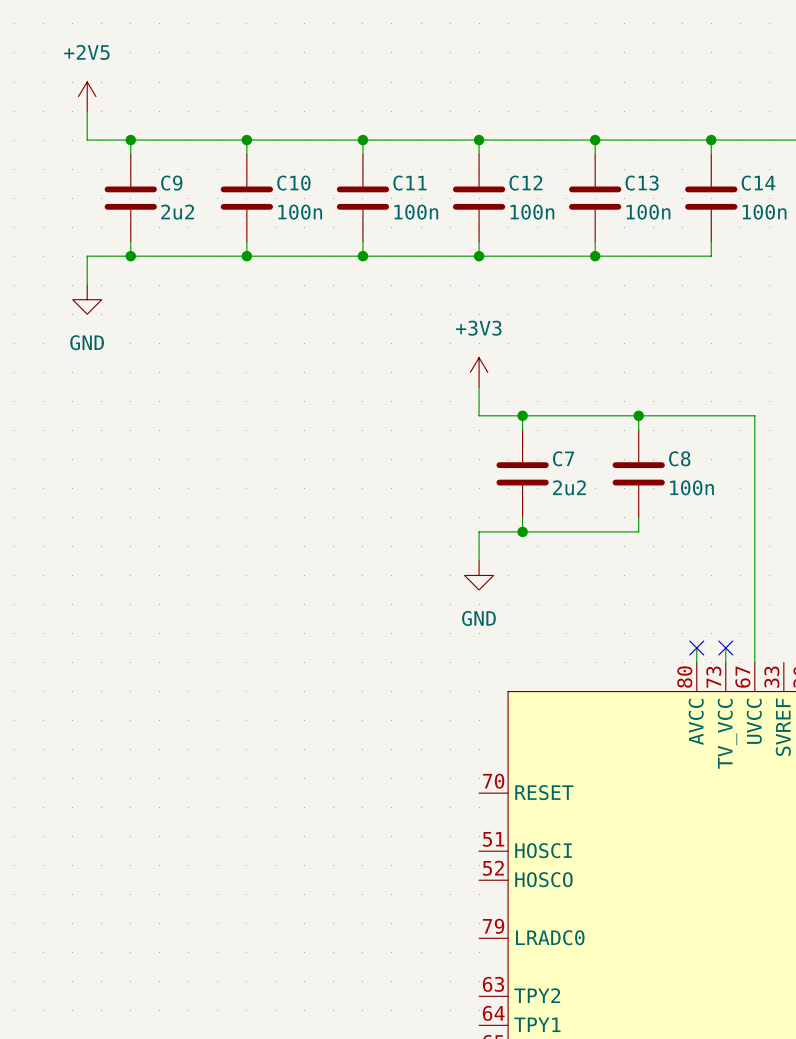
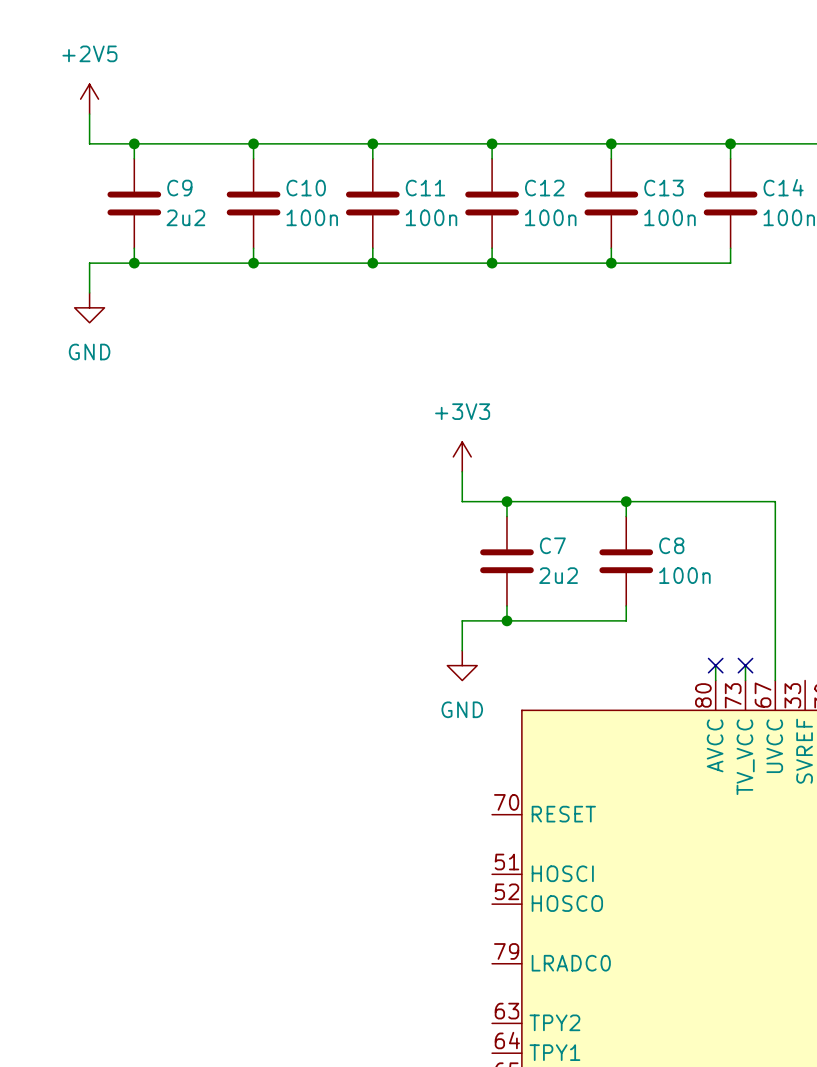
power symbol position: +3V3 (479, 372) -> +3V3 (462, 456)
wire: (479, 386) (479, 415) (754, 415) (754, 488) -> (462, 471) (462, 501) (775, 501)
wire: (522, 415) (522, 430) -> (506, 501) (506, 516)
junction: (522, 415) -> none
wire: (638, 415) (638, 430) -> (626, 501) (626, 516)
junction: (638, 415) -> none
C7 position: (522, 473) -> (506, 561)
C8 position: (638, 473) -> (626, 561)
junction: none -> (506, 501)
junction: none -> (626, 501)
wire: (522, 517) (522, 531) -> (506, 605) (506, 620)
wire: (638, 517) (638, 531) (479, 531) (479, 560) -> (626, 605) (626, 620) (462, 620) (462, 650)
junction: (522, 531) -> none
power symbol position: GND (479, 575) -> GND (462, 665)
junction: none -> (506, 620)

